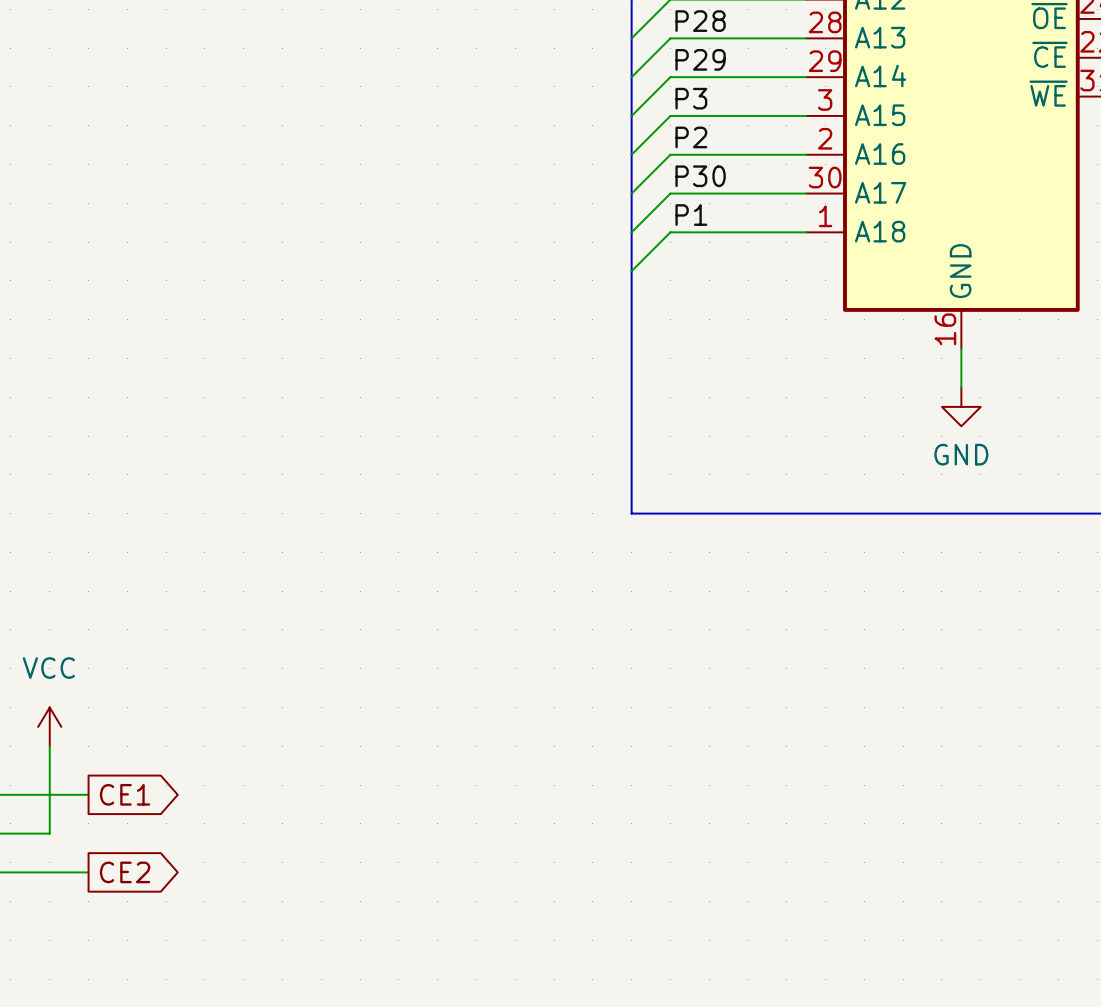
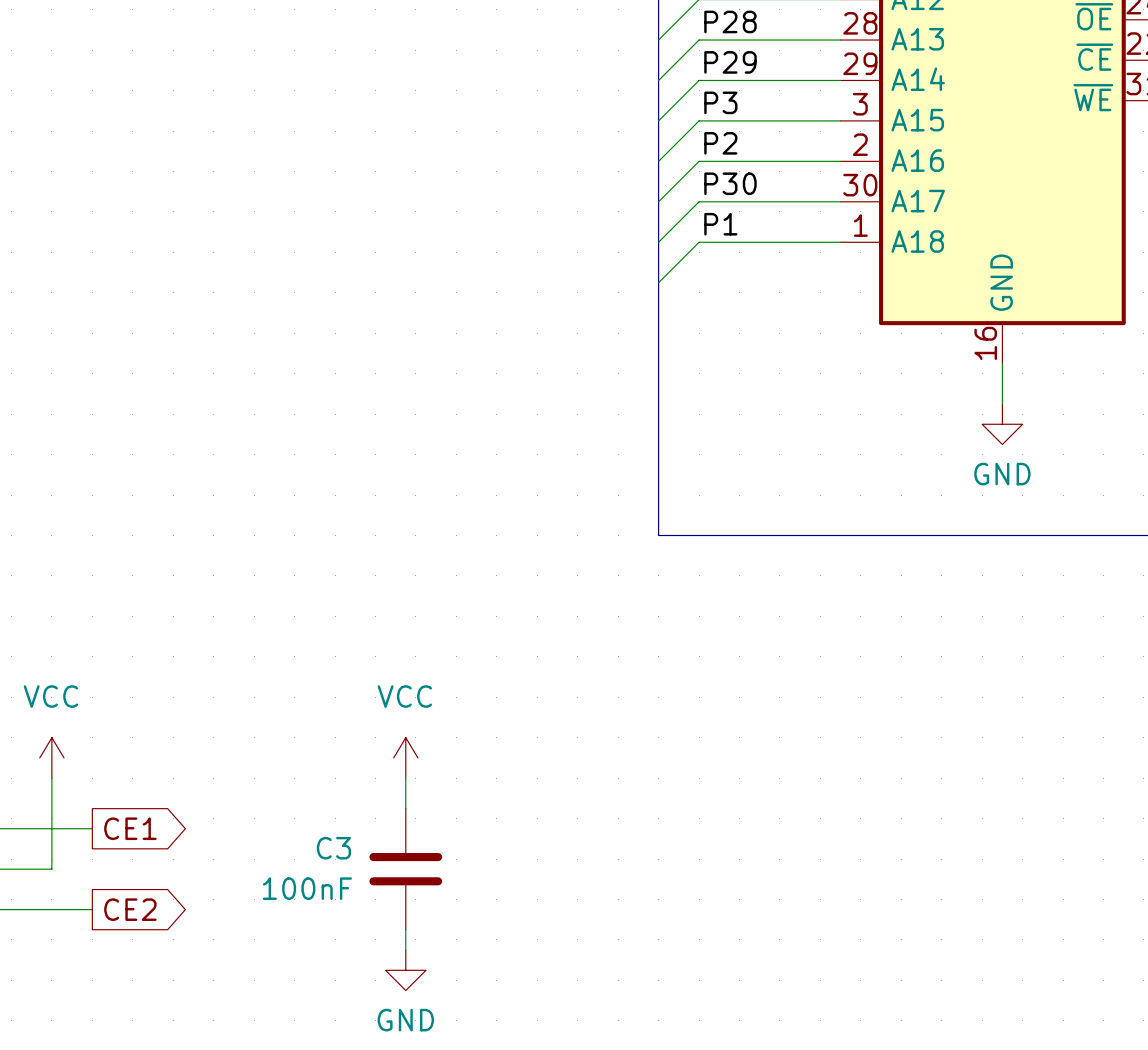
power symbol: none -> VCC (405, 757)
wire: none -> (405, 778) (405, 808)
C3: none -> 100nF (405, 869)
wire: none -> (405, 929) (405, 950)
power symbol: none -> GND (405, 970)

